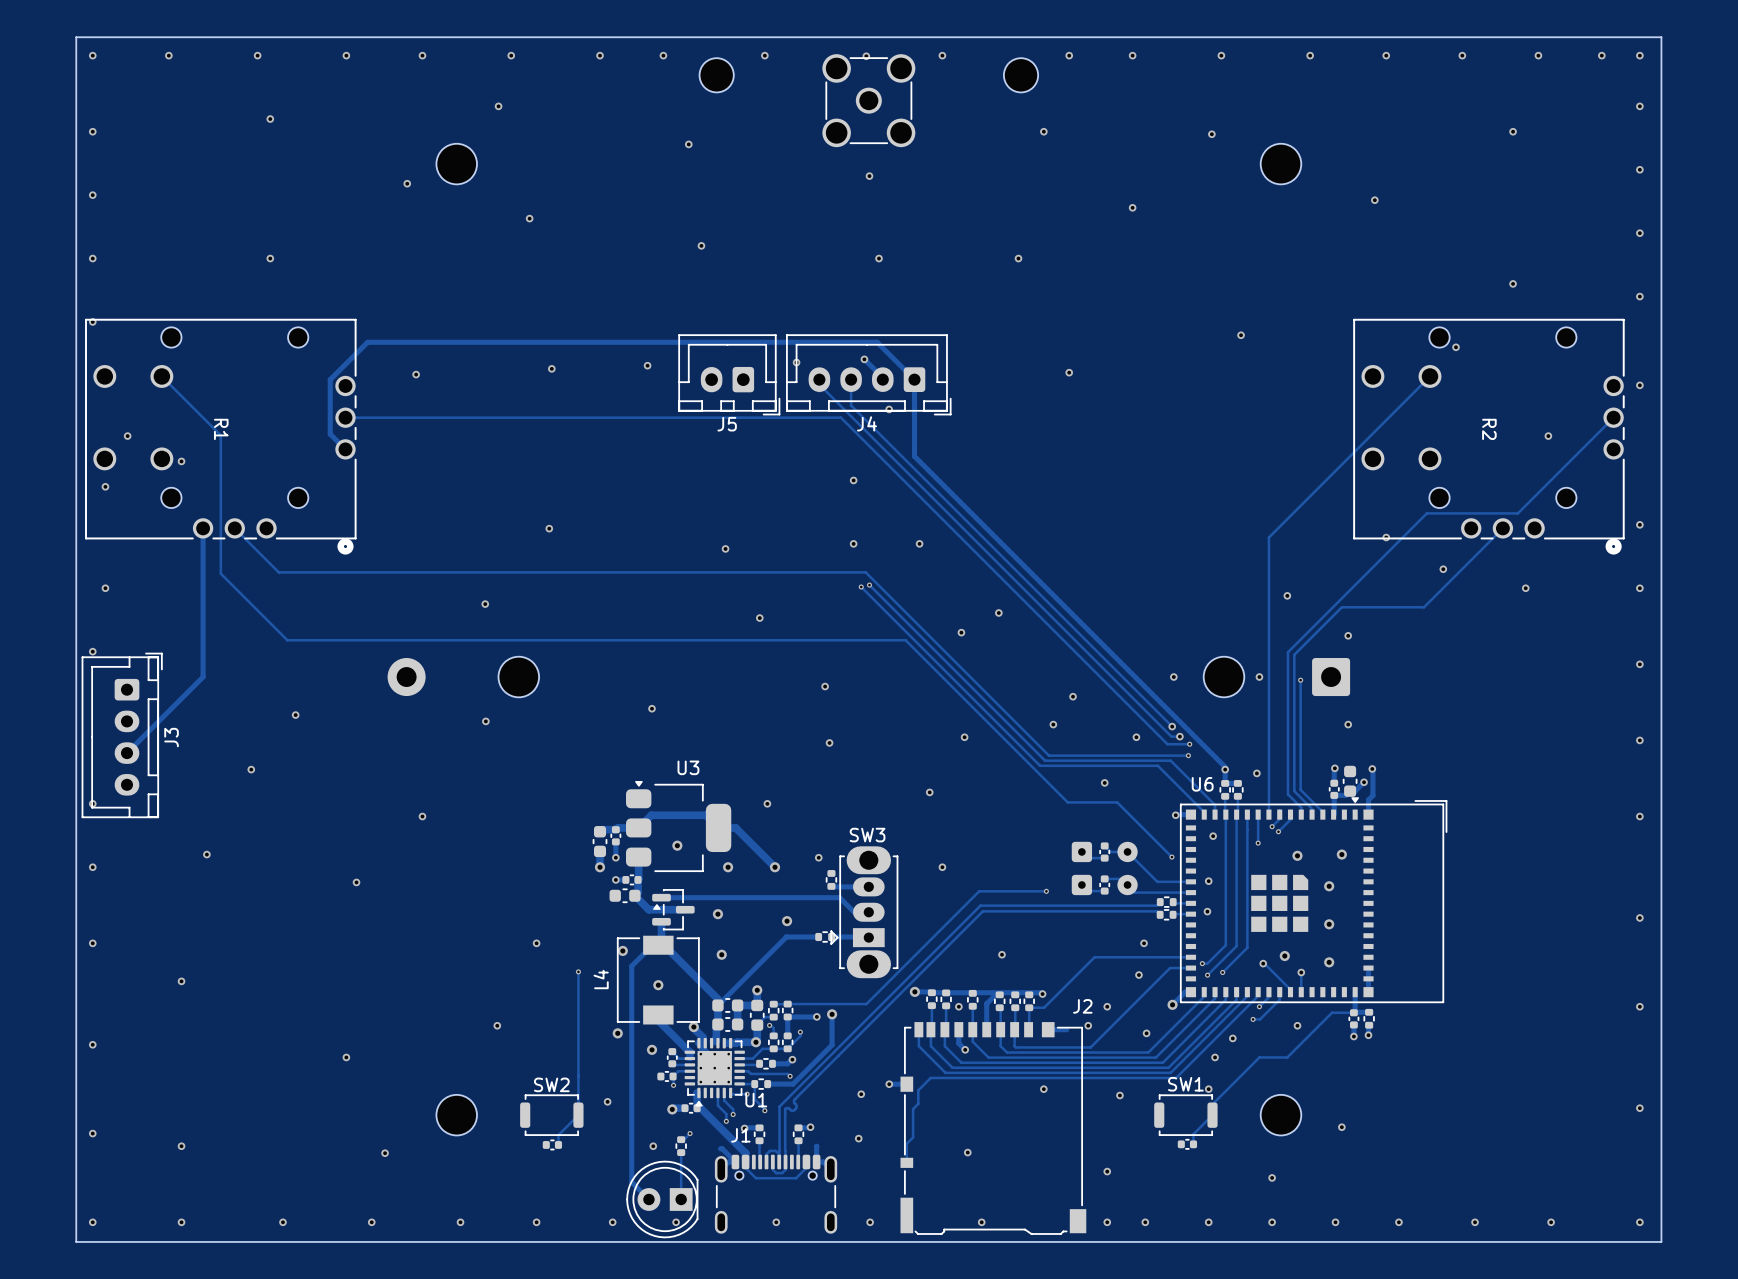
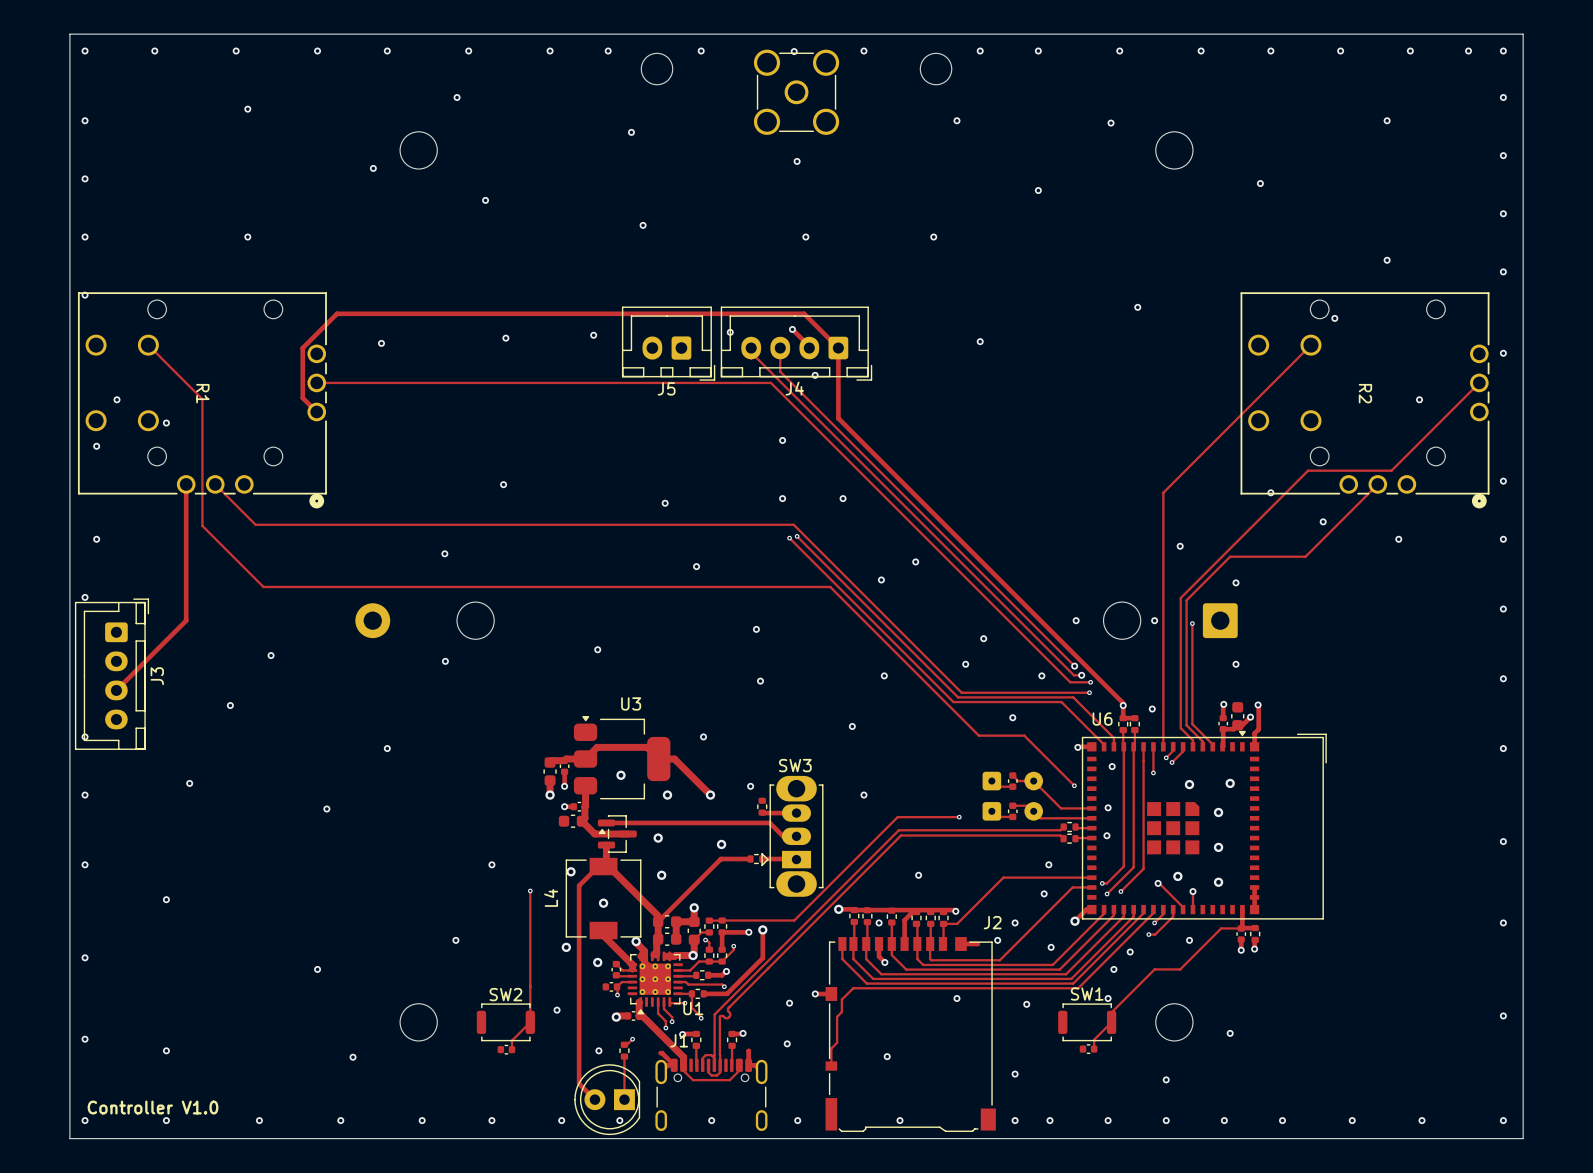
text: none -> Controller V1.0 (153, 1107)

